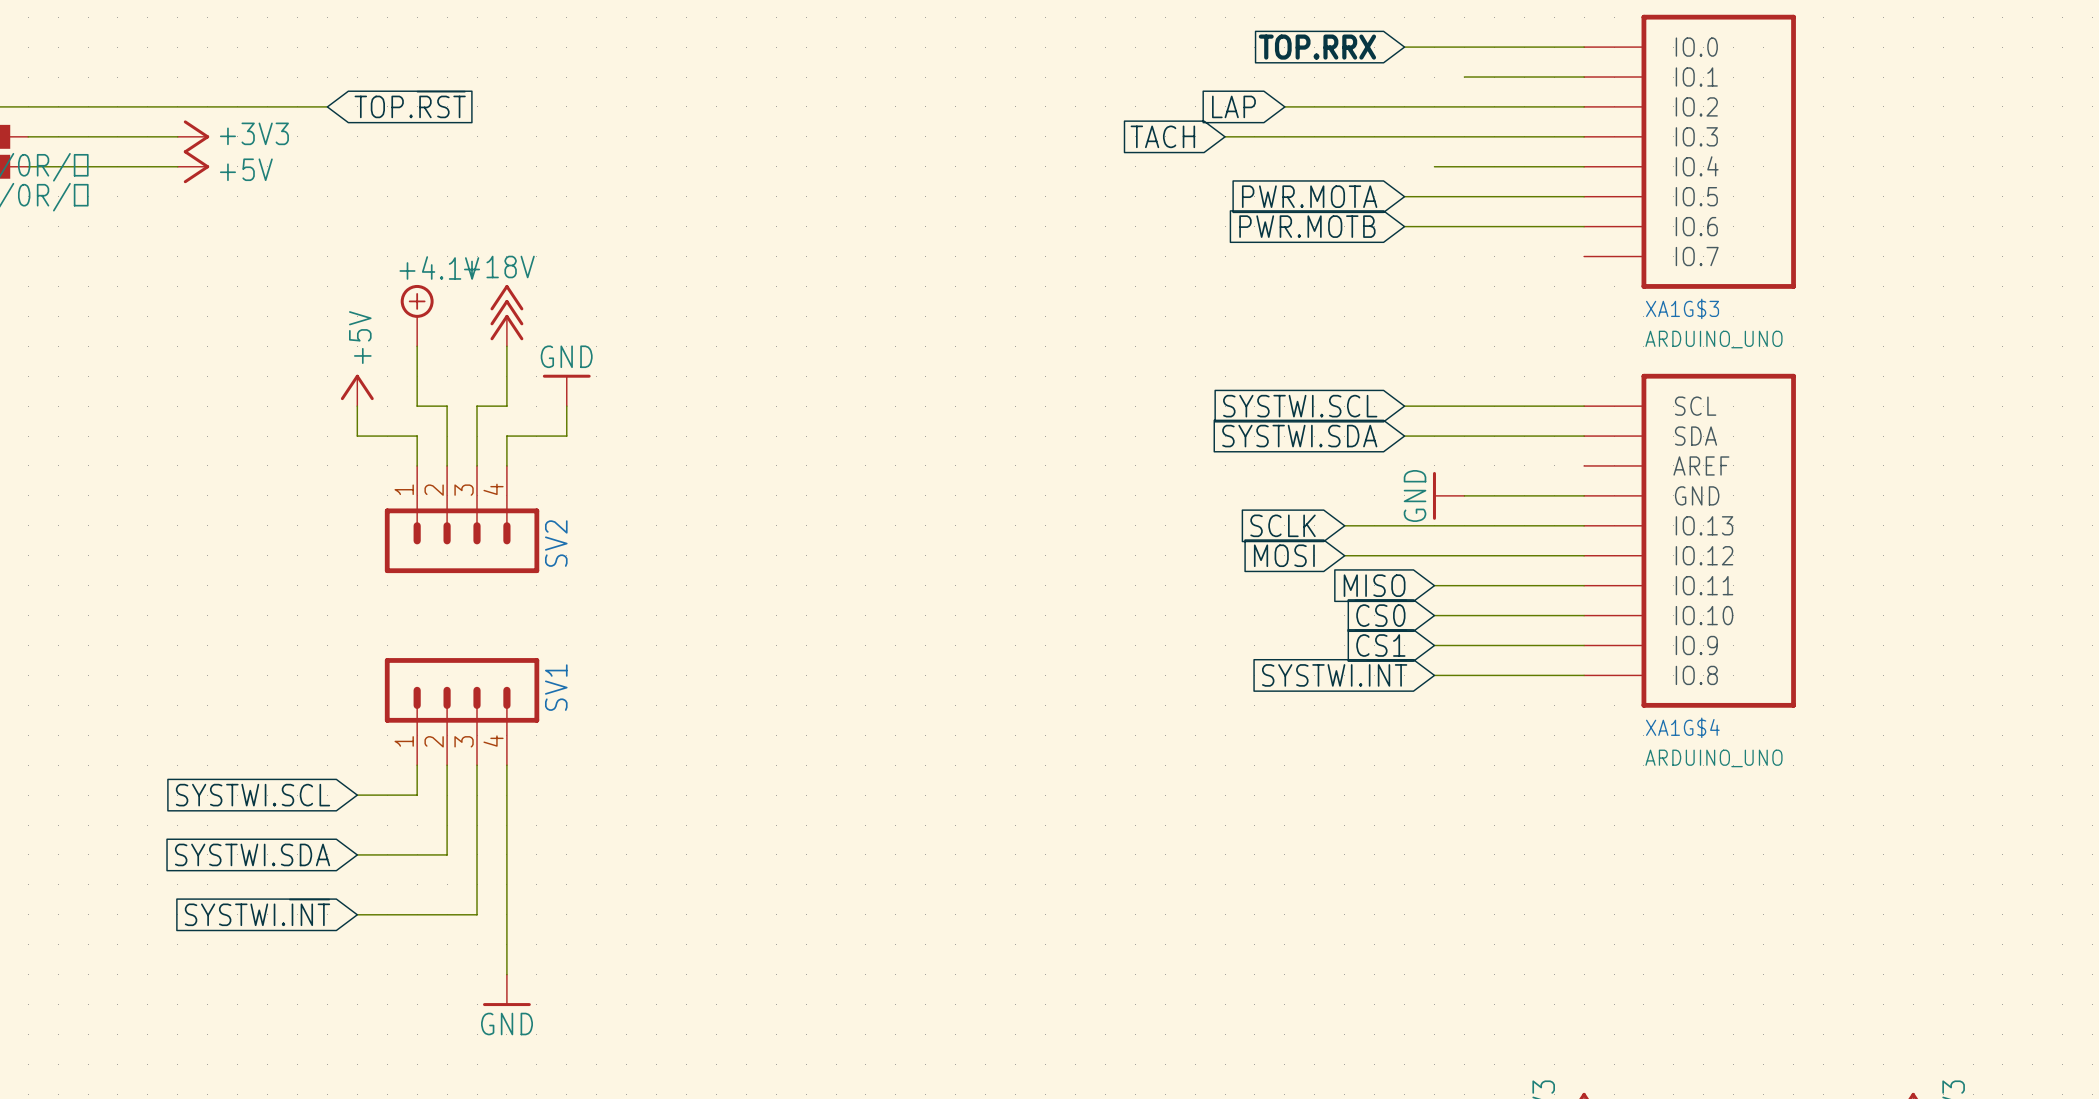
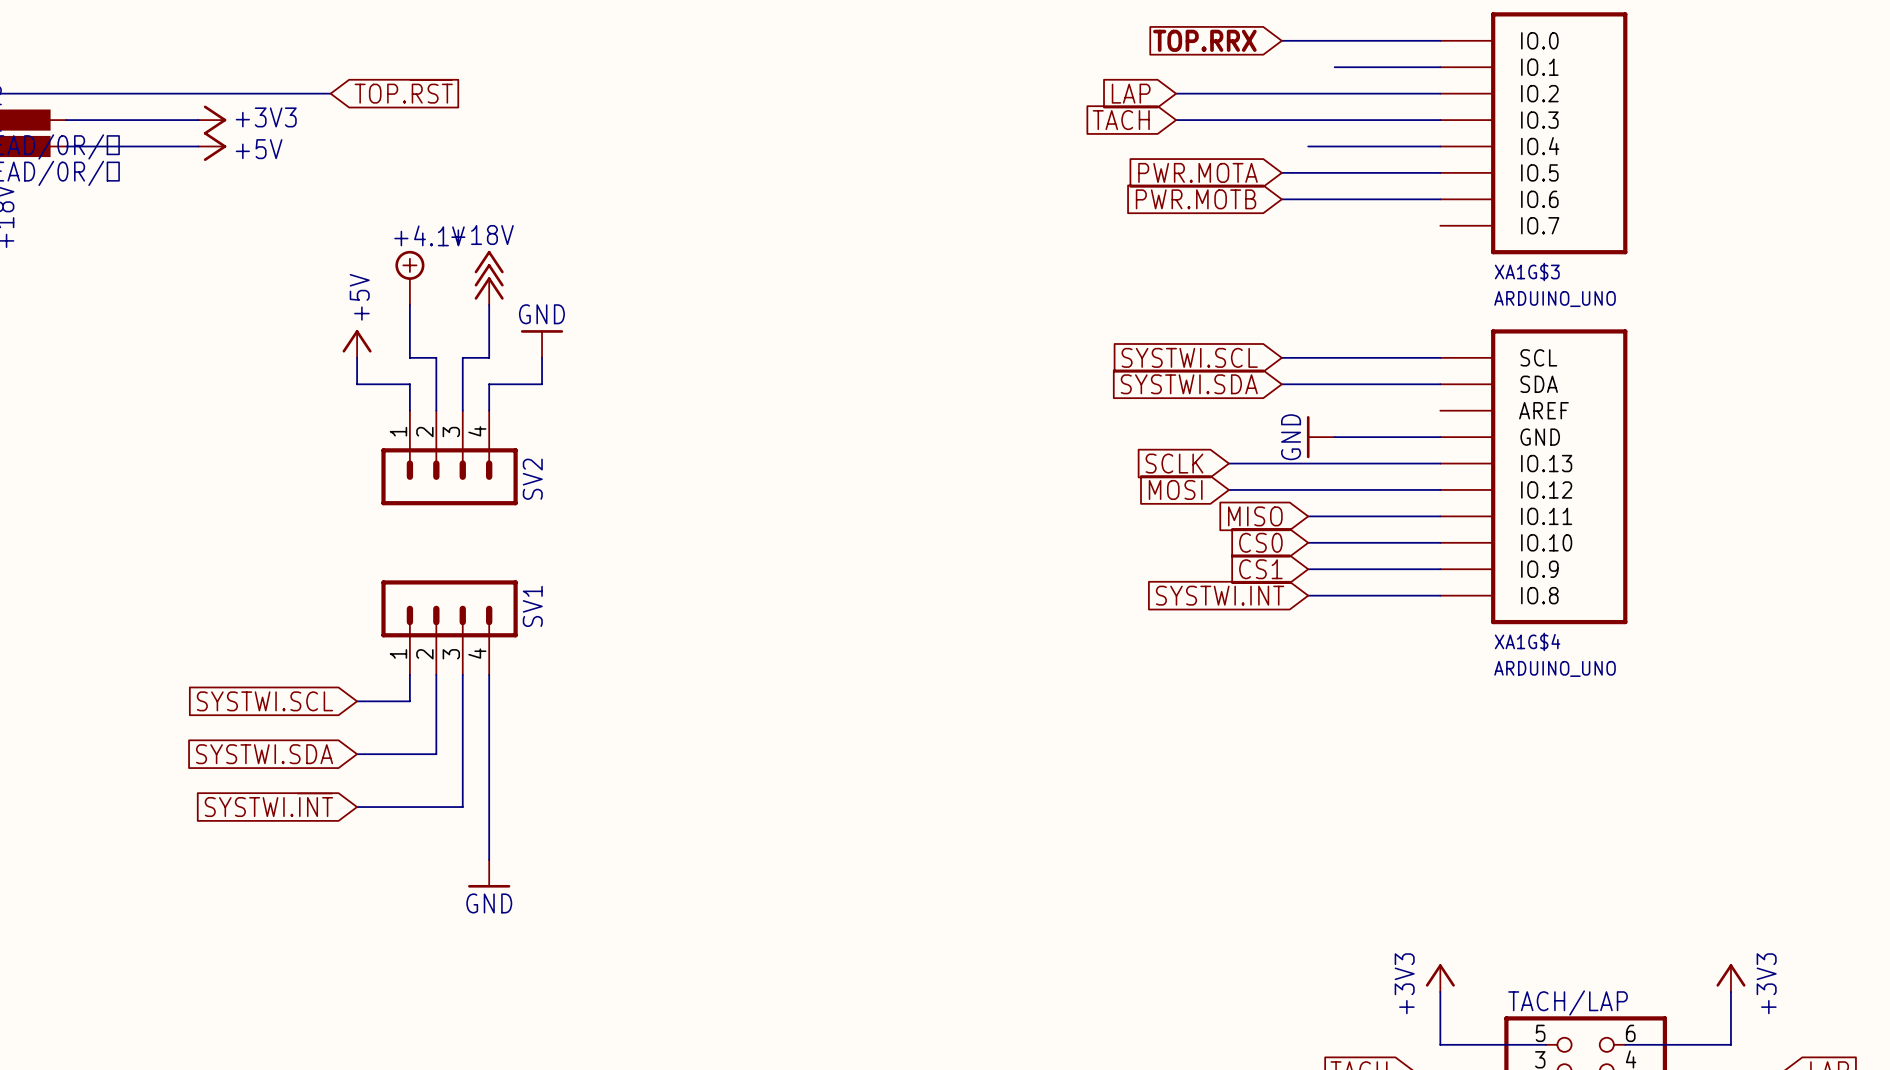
global label position: TACH (1162, 136) -> TACH (1121, 120)
wire: (1225, 136) (1284, 136) -> none

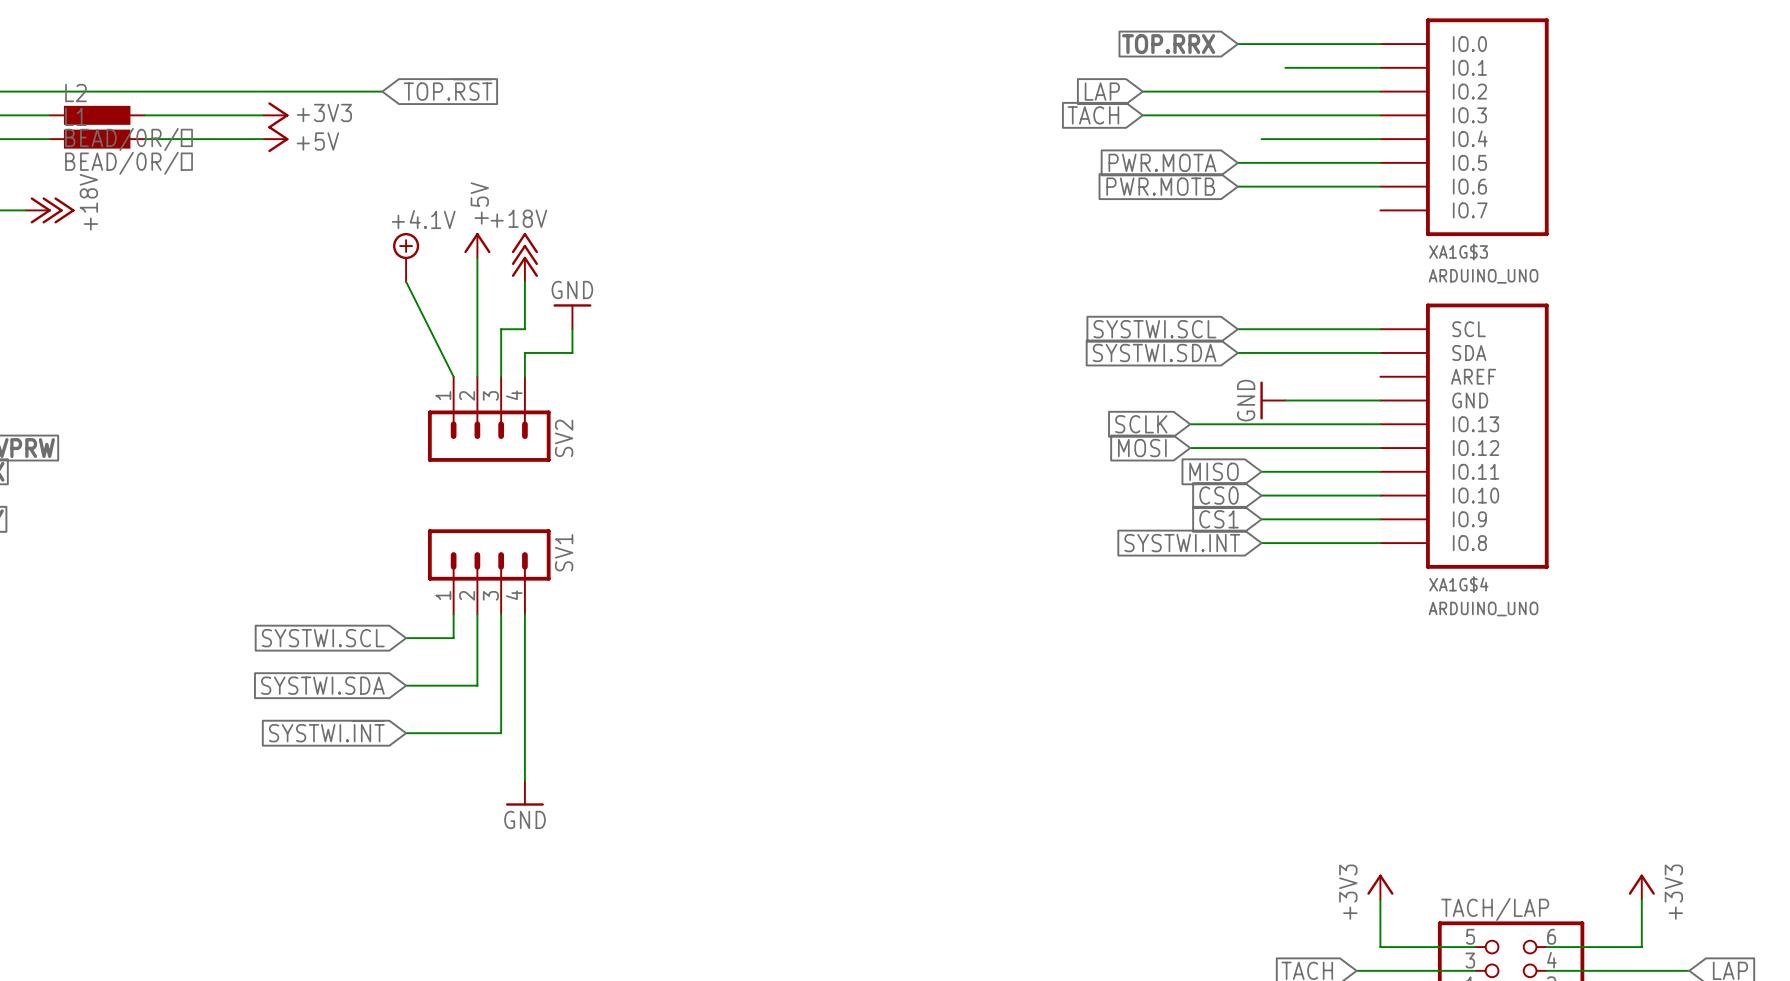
power symbol position: +4.1V (409, 277) -> +4.1V (406, 257)
wire: (409, 305) (409, 357) (436, 357) -> (477, 257) (477, 329)
power symbol position: +5V (357, 343) -> +5V (477, 245)
wire: (357, 357) (357, 384) (409, 384) (409, 410) -> (406, 281) (453, 376)

